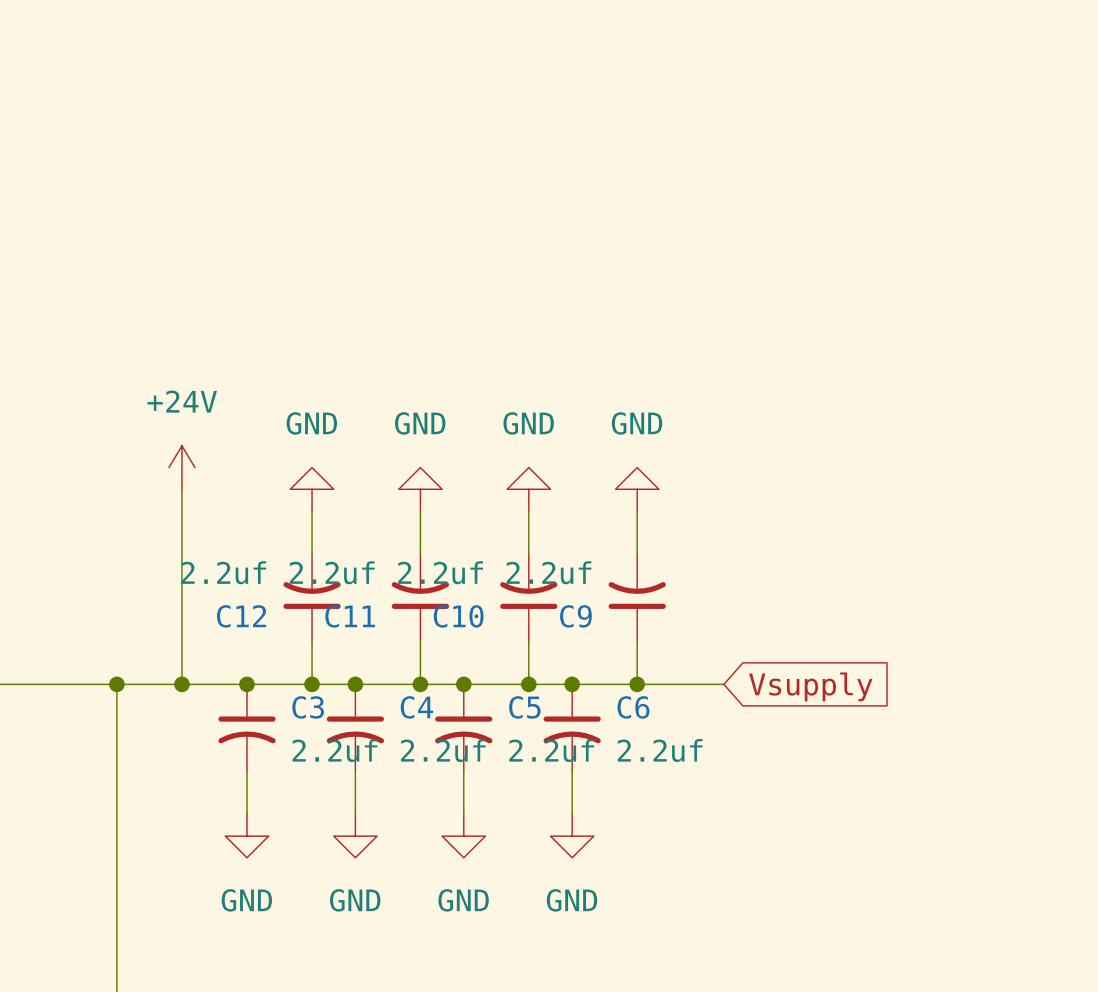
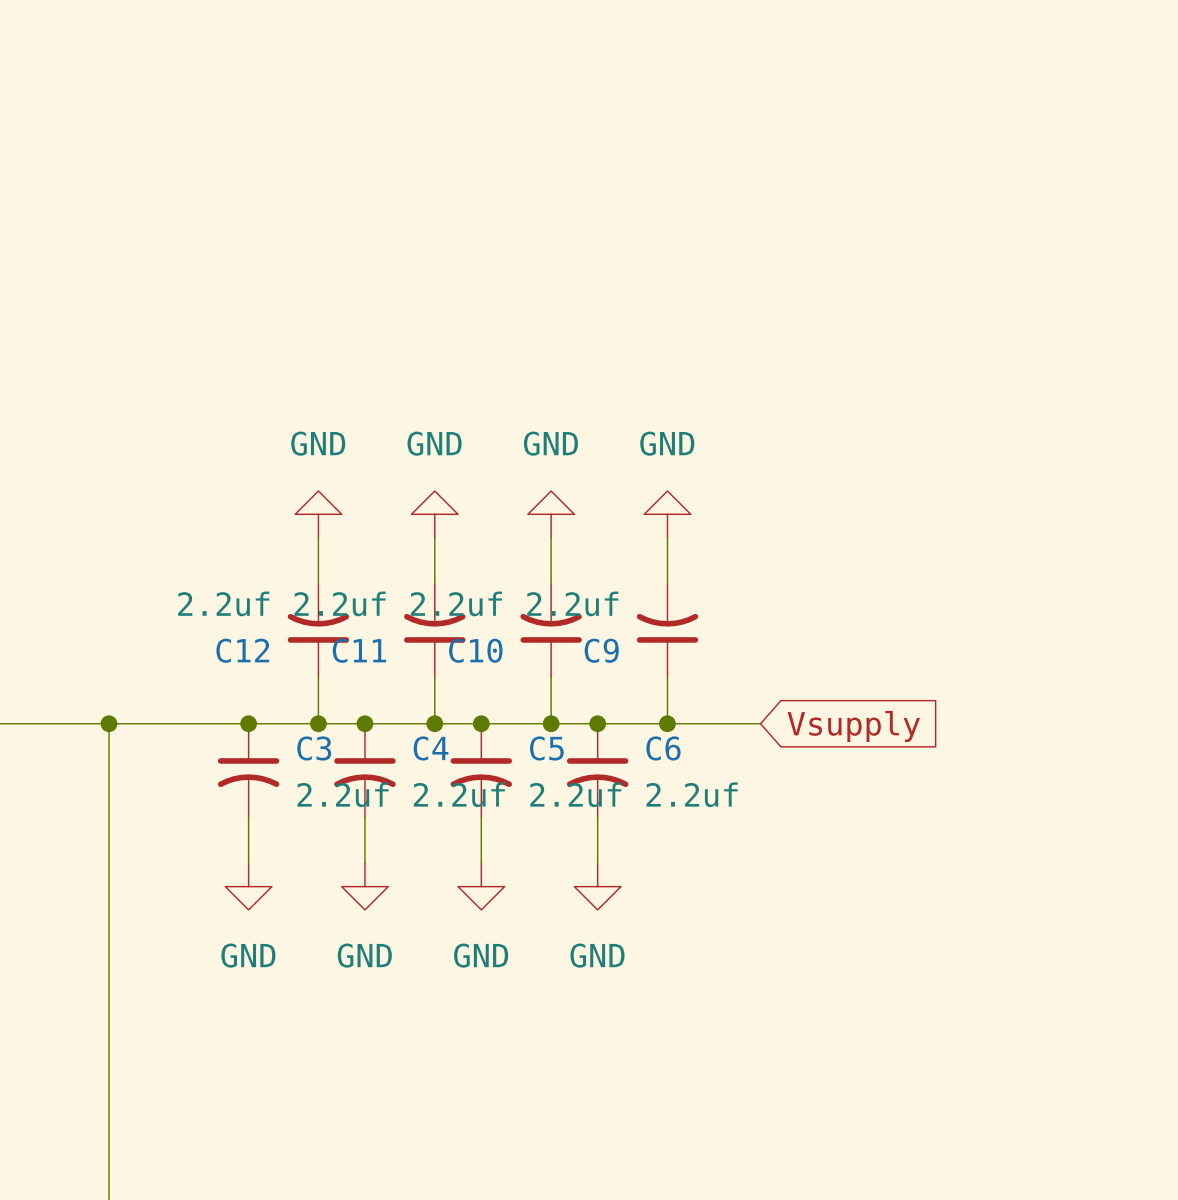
power symbol: +24V (181, 467) -> none
wire: (181, 489) (181, 684) -> none
junction: (181, 684) -> none

